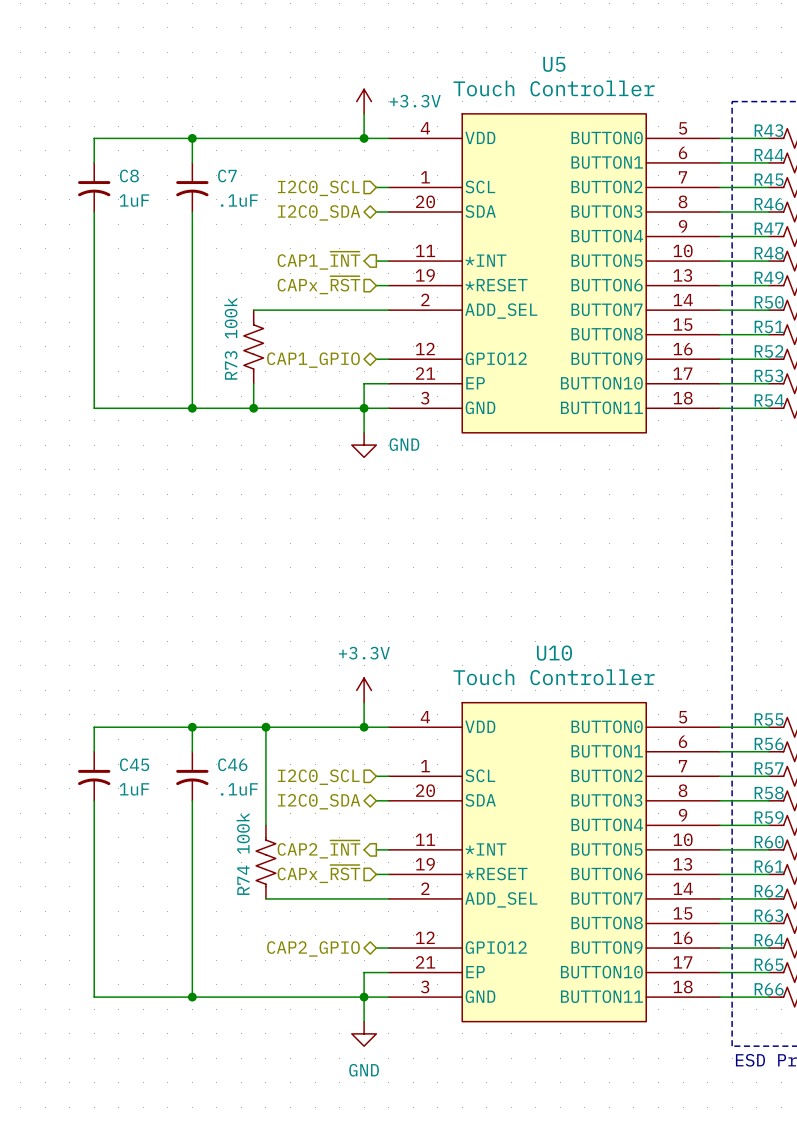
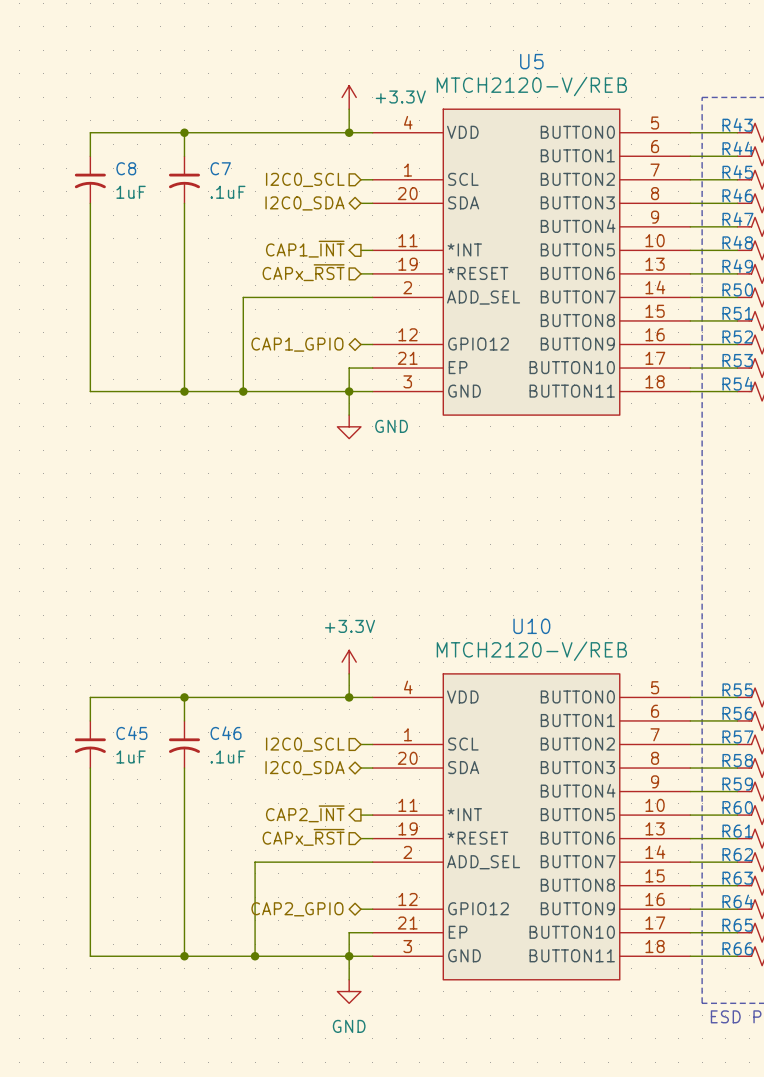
U5 value: Touch Controller (554, 88) -> MTCH2120-V/REB (531, 86)
R73: 100k (253, 346) -> none
U10 value: Touch Controller (554, 677) -> MTCH2120-V/REB (531, 651)
wire: (265, 727) (265, 825) -> (255, 862) (255, 956)
junction: (265, 727) -> none
R74: 100k (265, 862) -> none
junction: none -> (255, 956)

